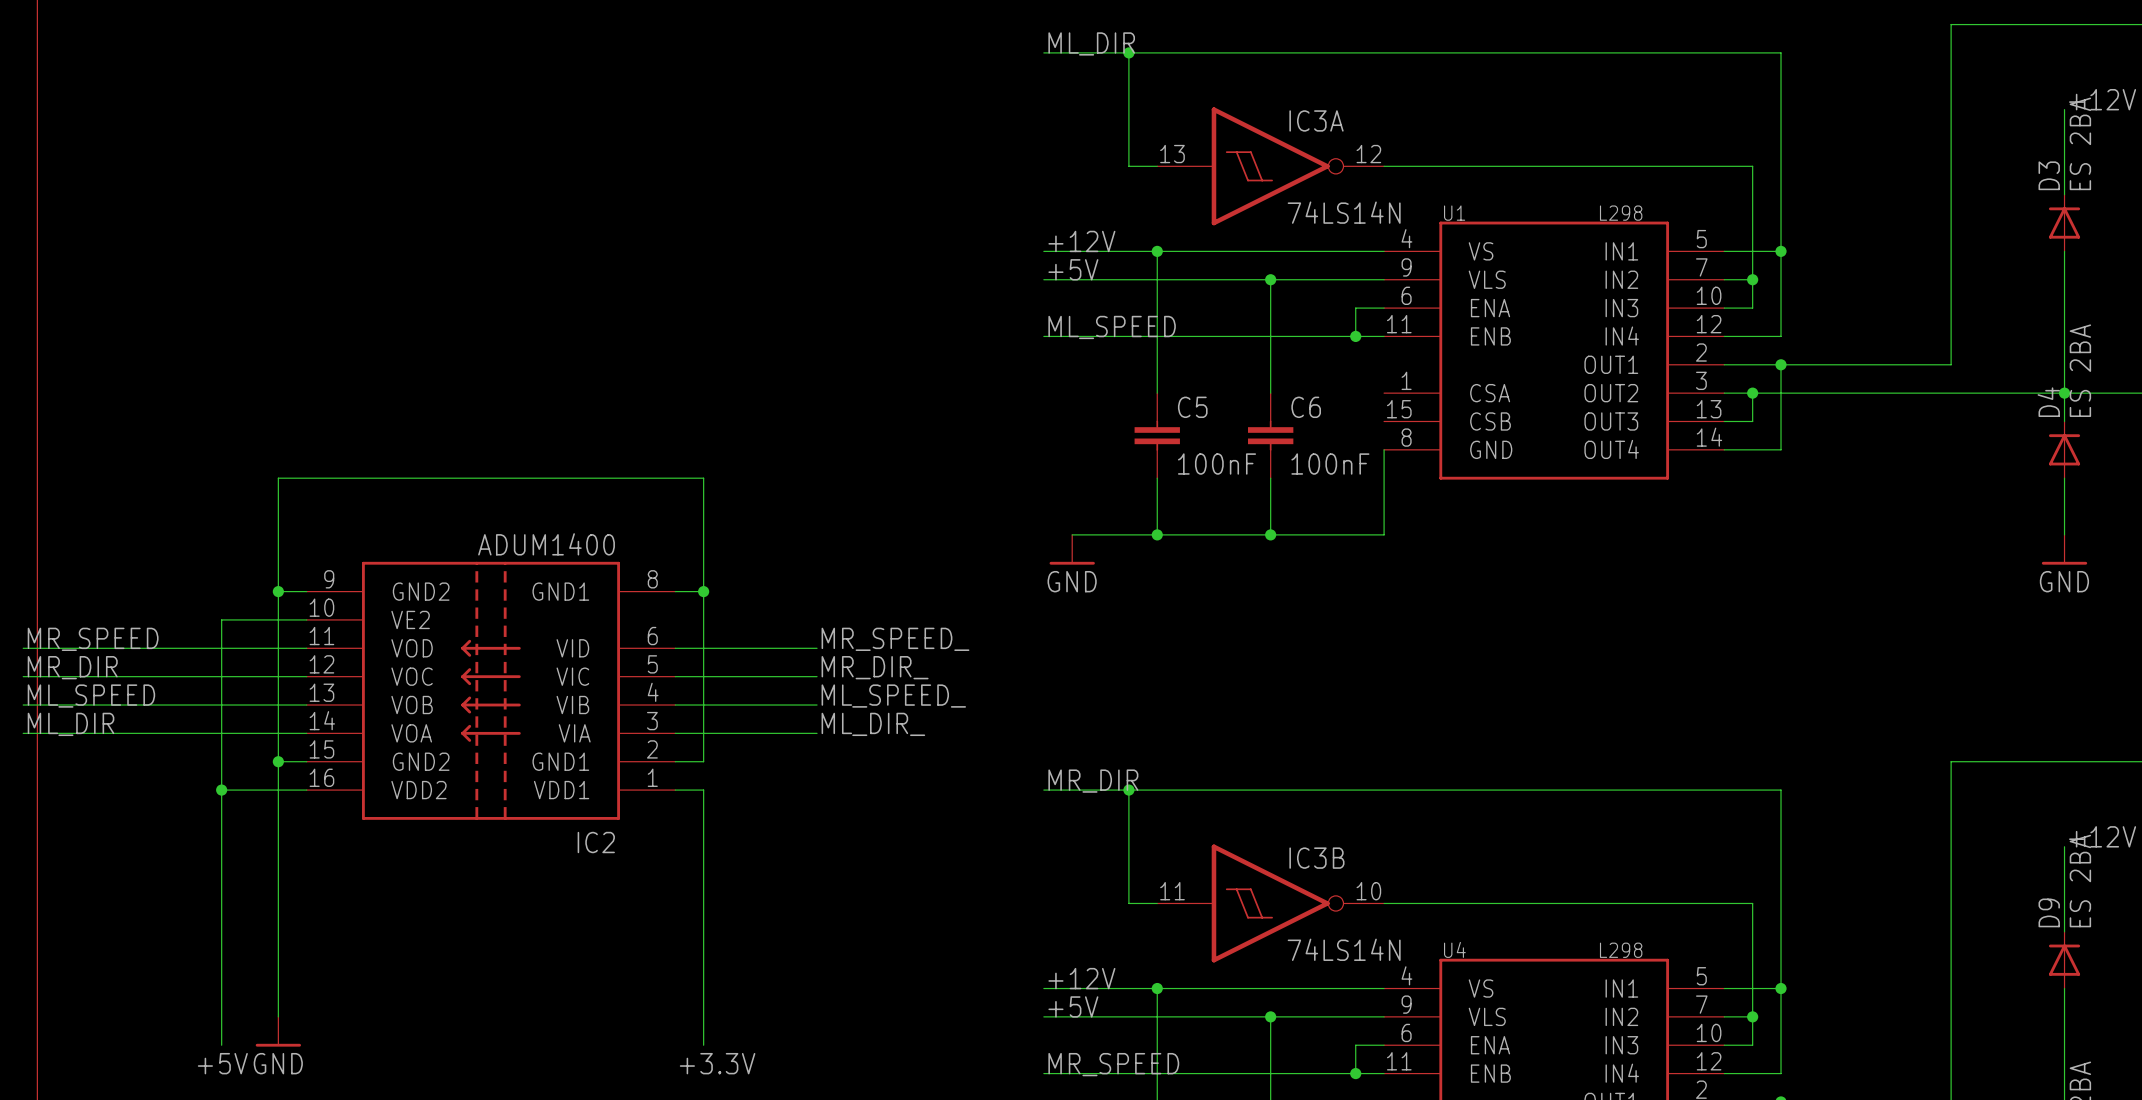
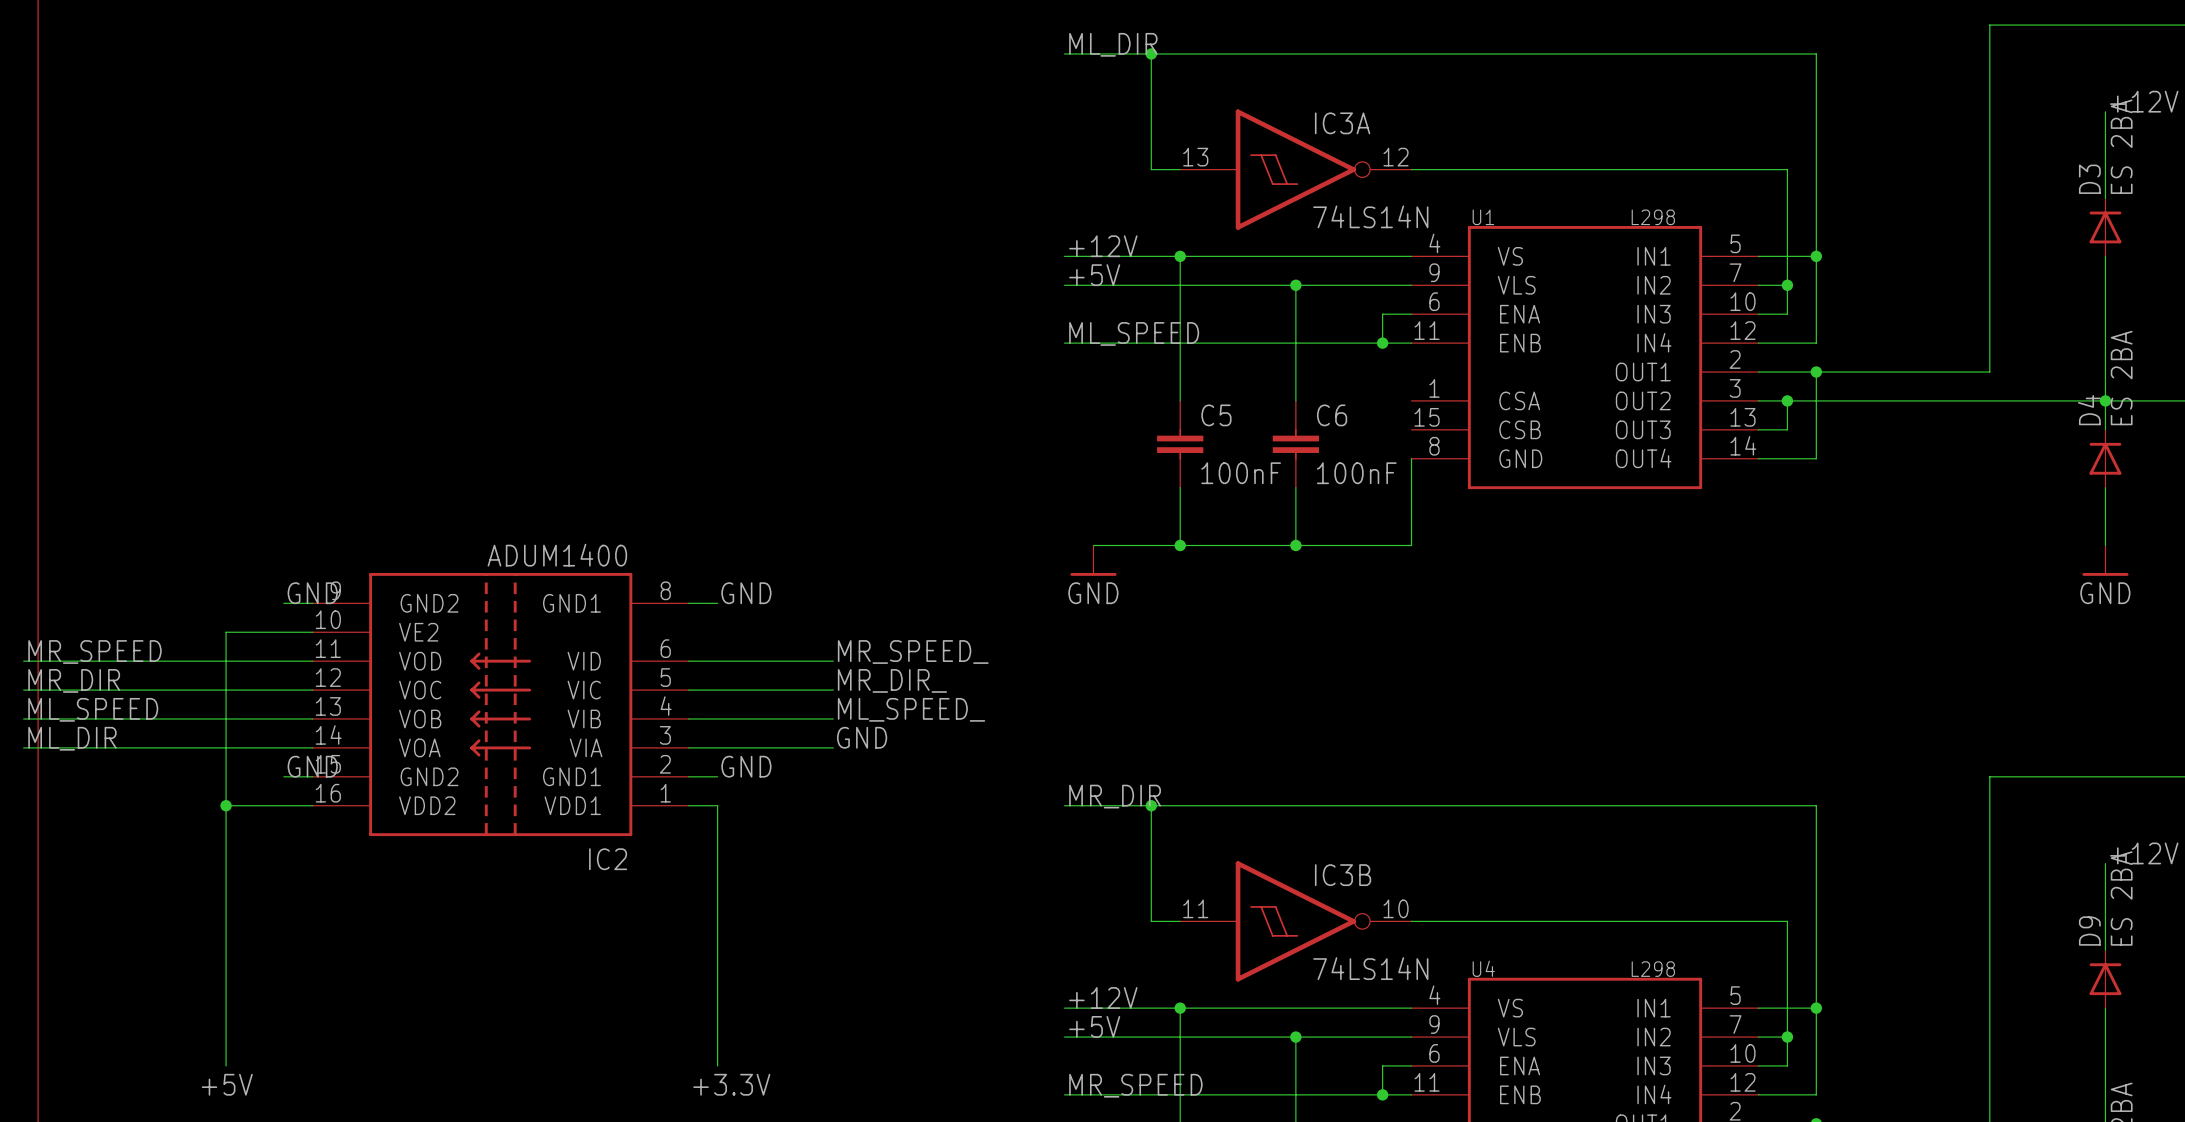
label: none -> GND (312, 593)
label: none -> GND (746, 593)
junction: (278, 591) -> none
junction: (703, 591) -> none
label: ML_DIR_ (873, 724) -> GND (862, 737)
label: none -> GND (312, 766)
label: none -> GND (746, 766)
junction: (278, 761) -> none
wire: (703, 761) (703, 478) (278, 478) (278, 1016) -> none
power symbol: GND (278, 1031) -> none

